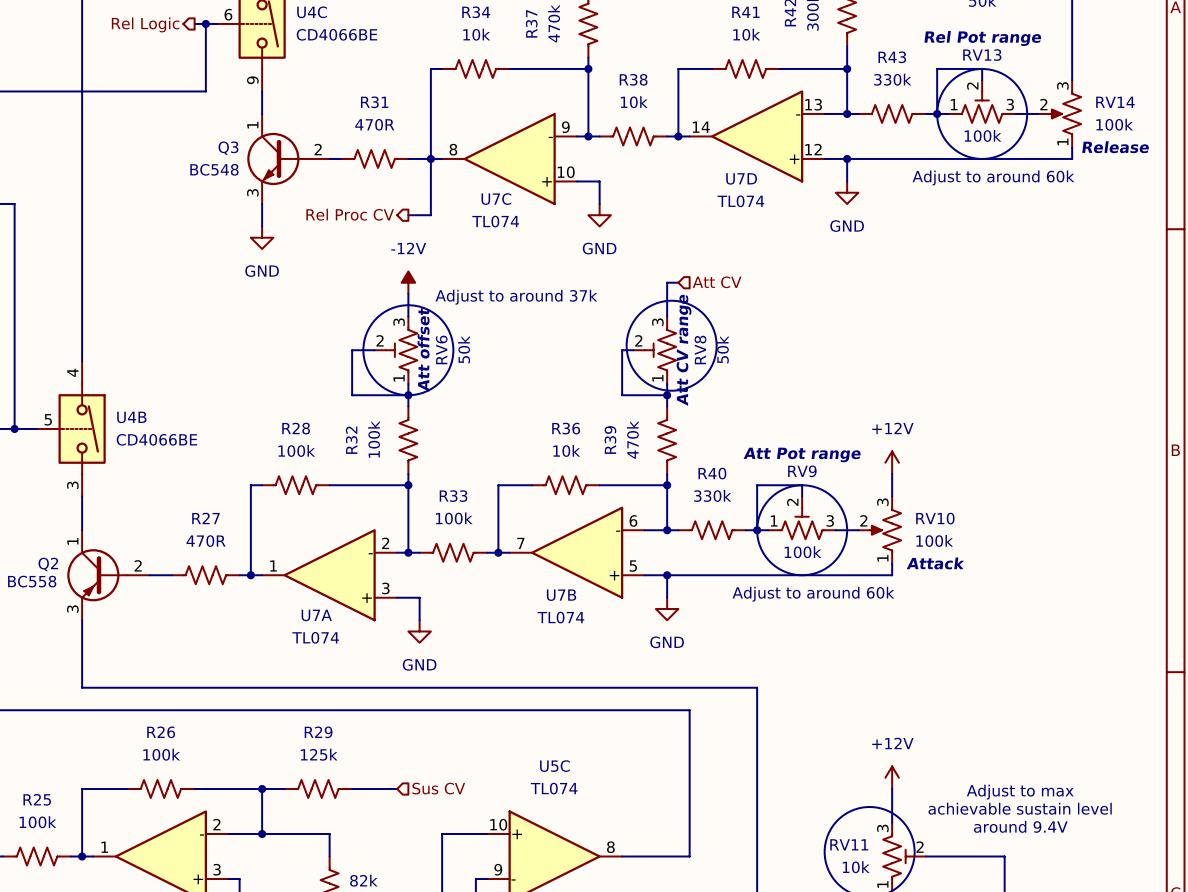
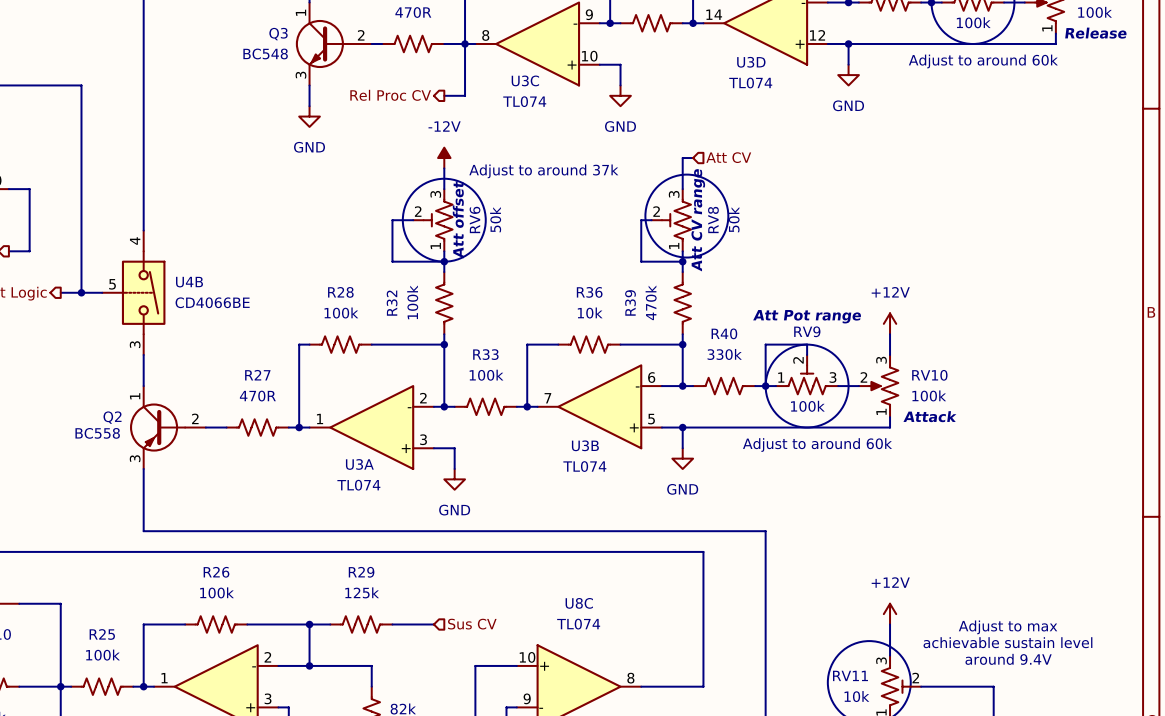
U7D name: U7D (741, 178) -> U3D (751, 62)
U7C name: U7C (496, 199) -> U3C (525, 80)
U7B name: U7B (561, 595) -> U3B (585, 445)
U7A name: U7A (316, 615) -> U3A (359, 464)
U5C name: U5C (554, 766) -> U8C (579, 603)

